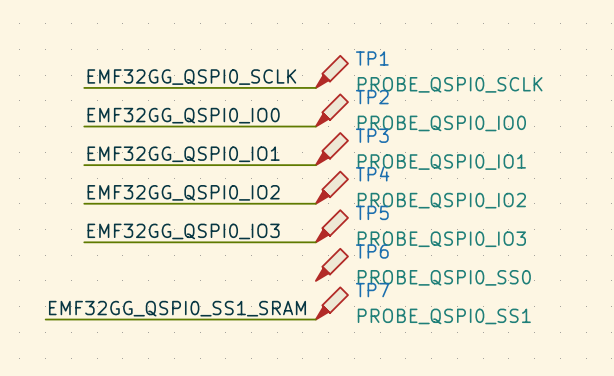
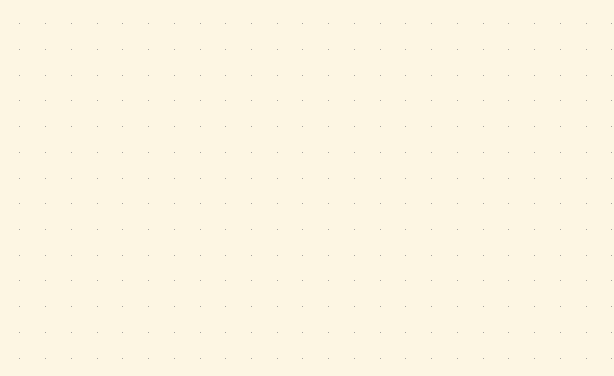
TP1: PROBE_QSPI0_SCLK (331, 71) -> none
label: EMF32GG_QSPI0_SCLK (191, 77) -> none
wire: (84, 87) (315, 87) -> none
TP2: PROBE_QSPI0_IO0 (331, 110) -> none
label: EMF32GG_QSPI0_IO0 (183, 115) -> none
wire: (84, 126) (315, 126) -> none
TP3: PROBE_QSPI0_IO1 (331, 149) -> none
label: EMF32GG_QSPI0_IO1 (183, 154) -> none
wire: (84, 165) (315, 165) -> none
TP4: PROBE_QSPI0_IO2 (331, 187) -> none
label: EMF32GG_QSPI0_IO2 (183, 192) -> none
wire: (84, 203) (315, 203) -> none
TP5: PROBE_QSPI0_IO3 (331, 226) -> none
label: EMF32GG_QSPI0_IO3 (183, 231) -> none
wire: (84, 242) (315, 242) -> none
TP6: PROBE_QSPI0_SS0 (331, 264) -> none
TP7: PROBE_QSPI0_SS1 (331, 303) -> none
label: EMF32GG_QSPI0_SS1_SRAM (177, 308) -> none
wire: (45, 319) (315, 319) -> none

